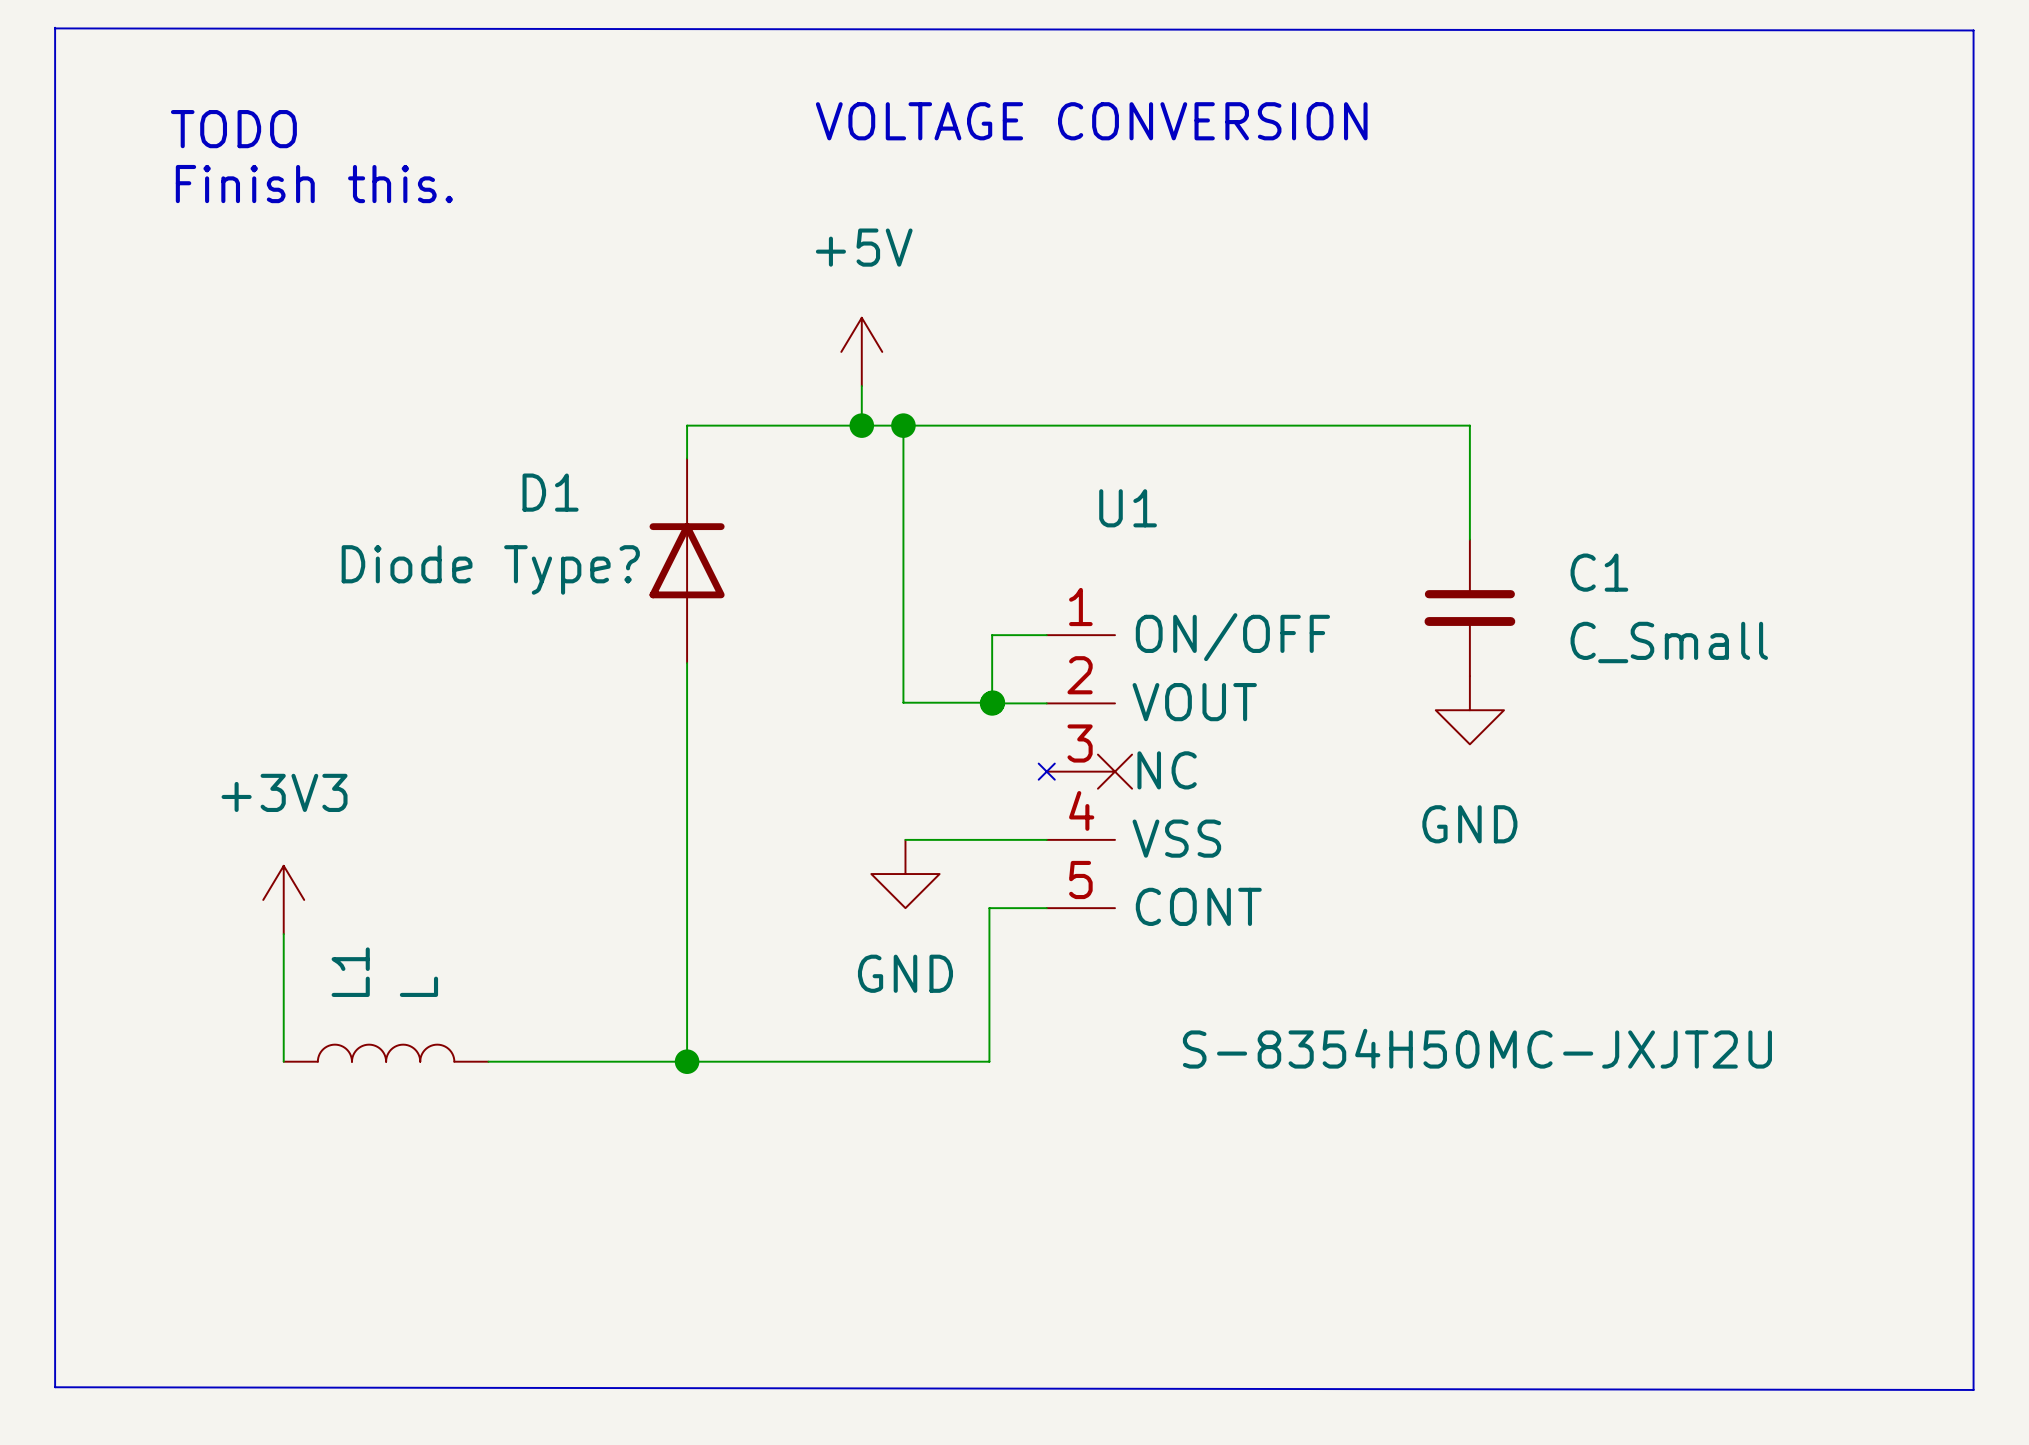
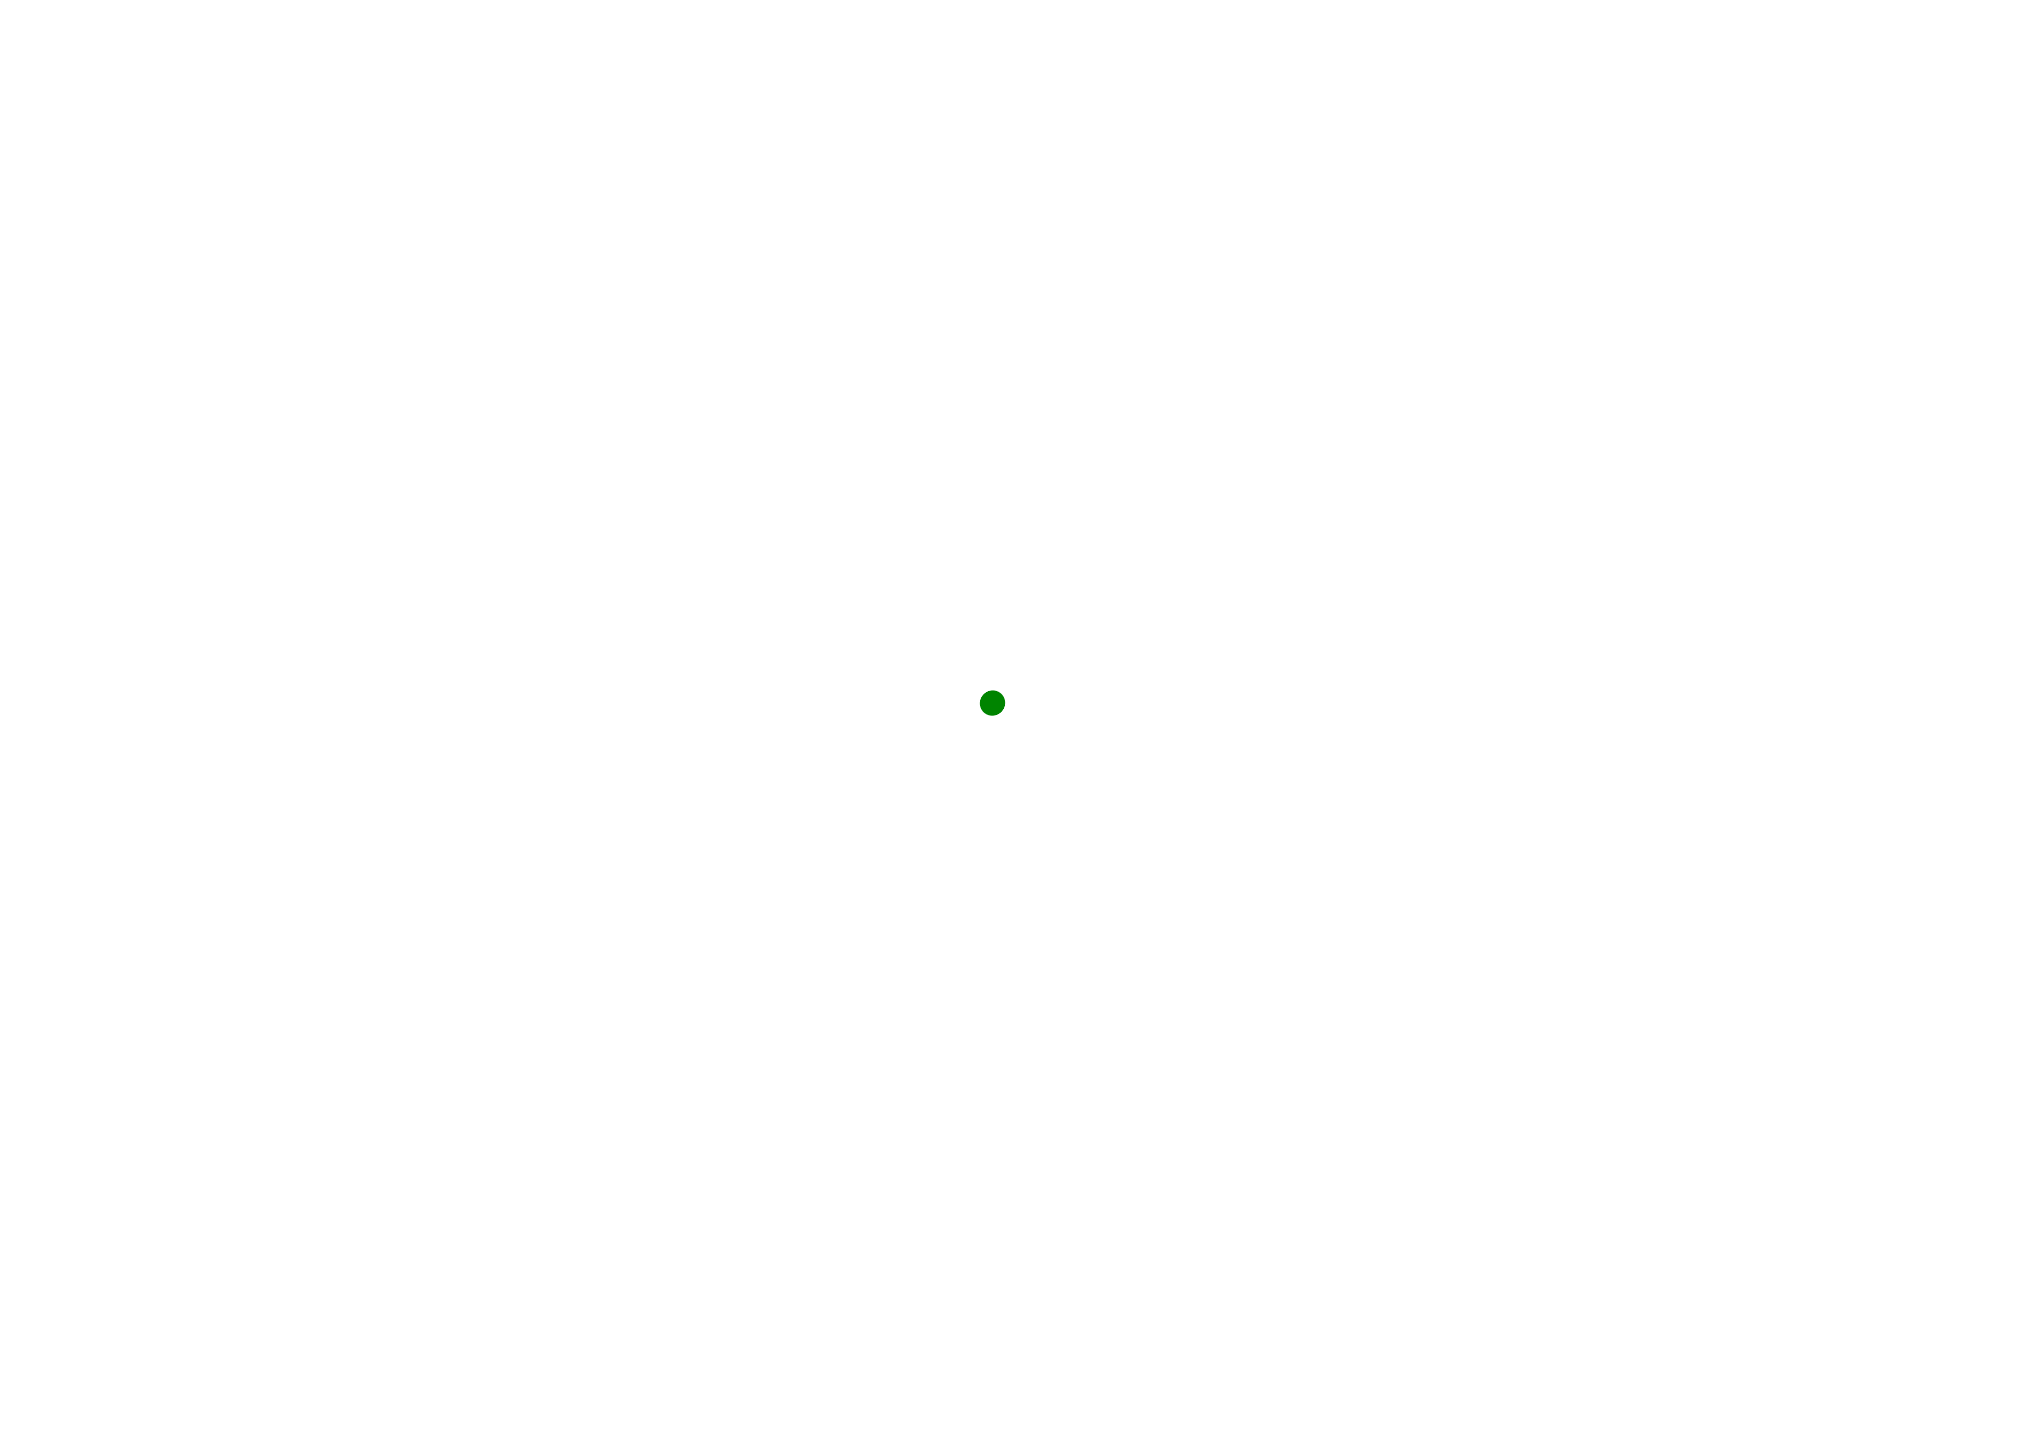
line: (55, 27) (55, 1387) (1973, 1389) (1973, 30) (55, 28) -> none
text: VOLTAGE CONVERSION (1091, 121) -> none
text: TODO (233, 129) -> none
text: Finish this. (314, 184) -> none
power symbol: +5V (861, 351) -> none
wire: (861, 386) (861, 425) -> none
junction: (861, 425) -> none
wire: (903, 425) (903, 702) (992, 702) -> none
junction: (903, 425) -> none
wire: (687, 458) (687, 425) (1469, 425) (1469, 539) -> none
D1: Diode Type? (687, 560) -> none
C1: C_Small (1469, 607) -> none
wire: (1046, 635) (992, 635) (992, 703) (1046, 703) -> none
wire: (687, 663) (687, 1061) -> none
power symbol: GND (1469, 710) -> none
U1: S-8354H50MC-JXJT2U (1085, 771) -> none
wire: (905, 839) (1046, 839) -> none
power symbol: GND (905, 874) -> none
power symbol: +3V3 (283, 899) -> none
wire: (1046, 908) (989, 908) (989, 1061) (488, 1061) -> none
wire: (283, 934) (283, 1061) -> none
L1: L (386, 1053) -> none
junction: (687, 1061) -> none

